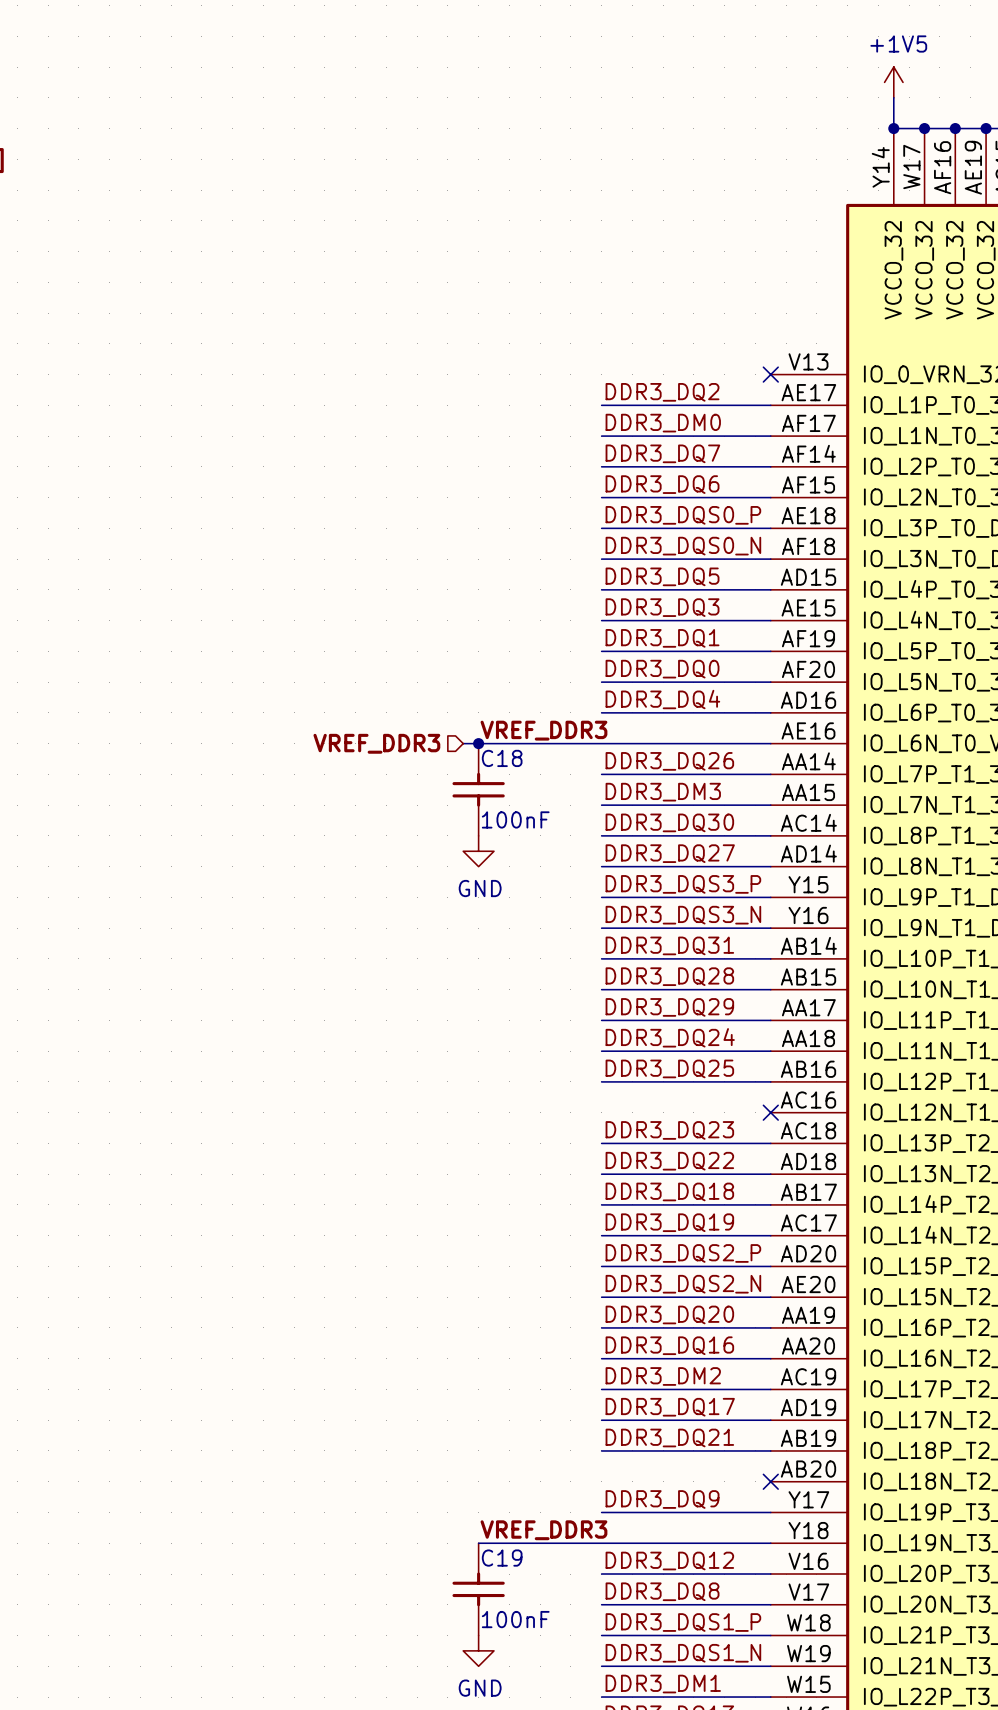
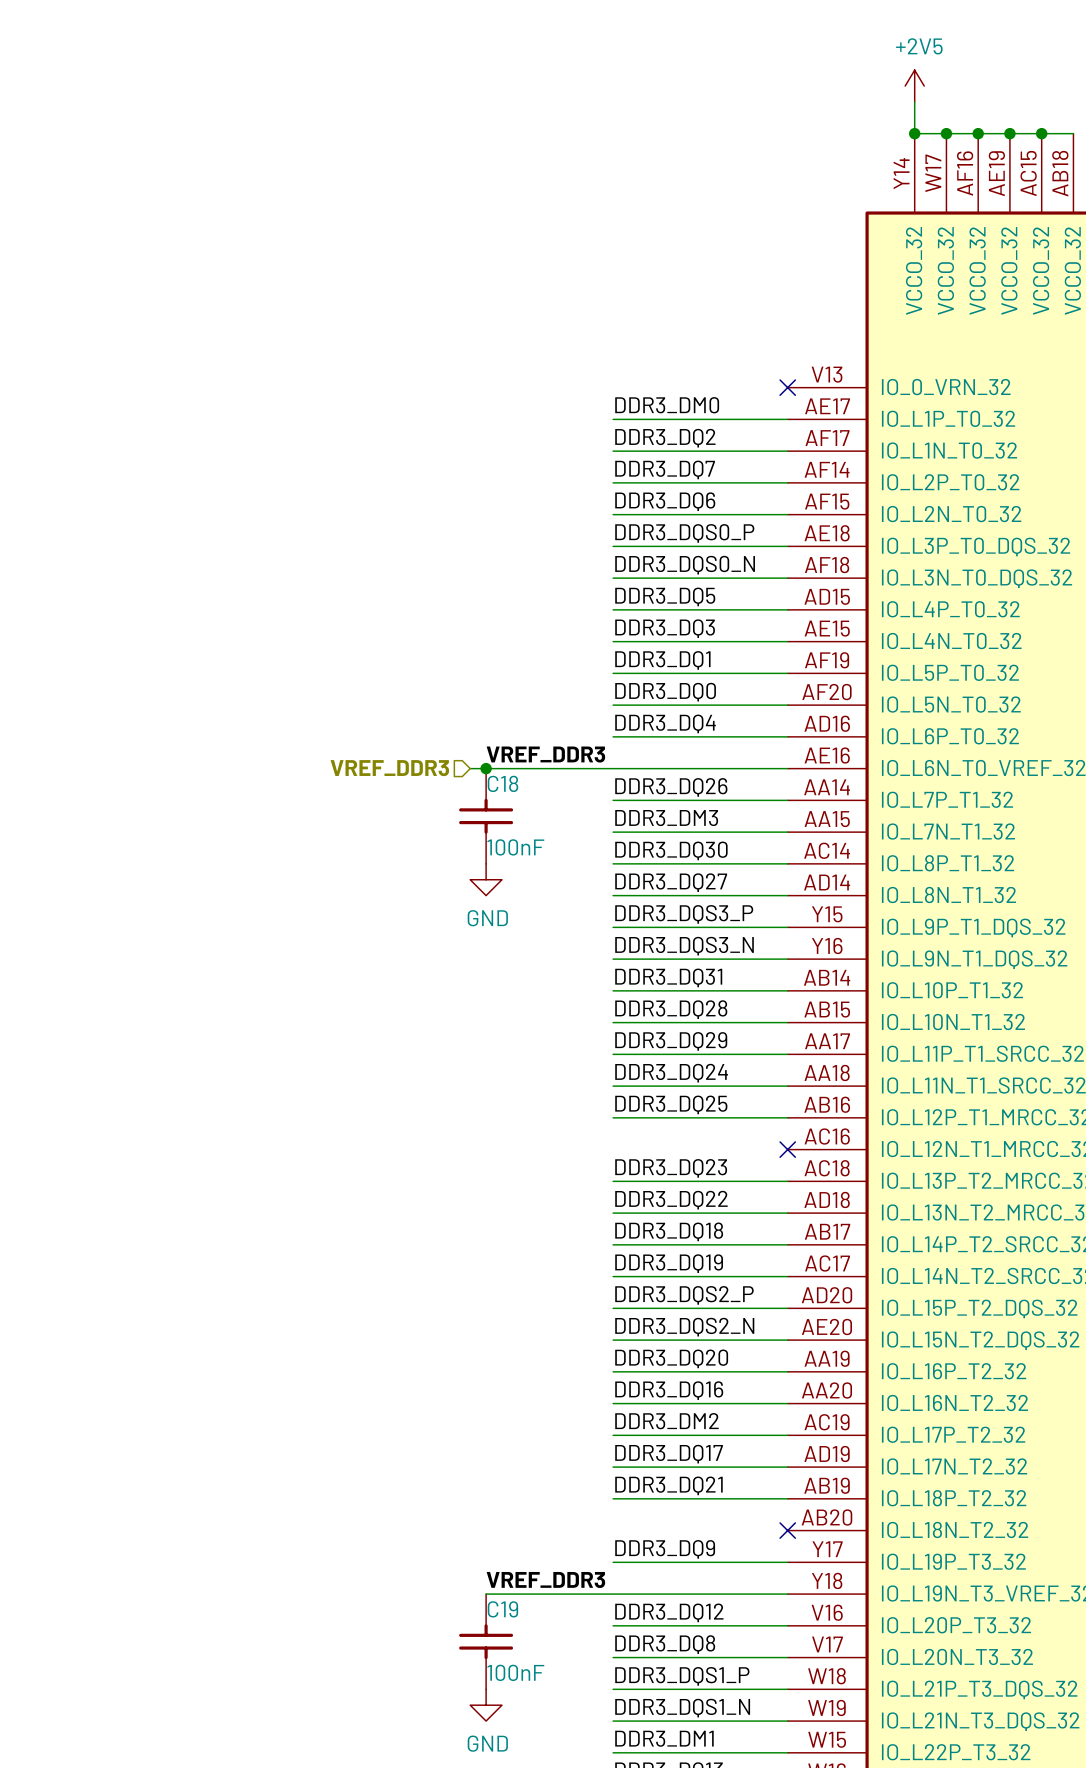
power symbol: +1V5 (893, 82) -> +2V5 (914, 86)
label: DDR3_DQ2 (662, 392) -> DDR3_DM0 (667, 405)
label: DDR3_DM0 (663, 423) -> DDR3_DQ2 (665, 438)

